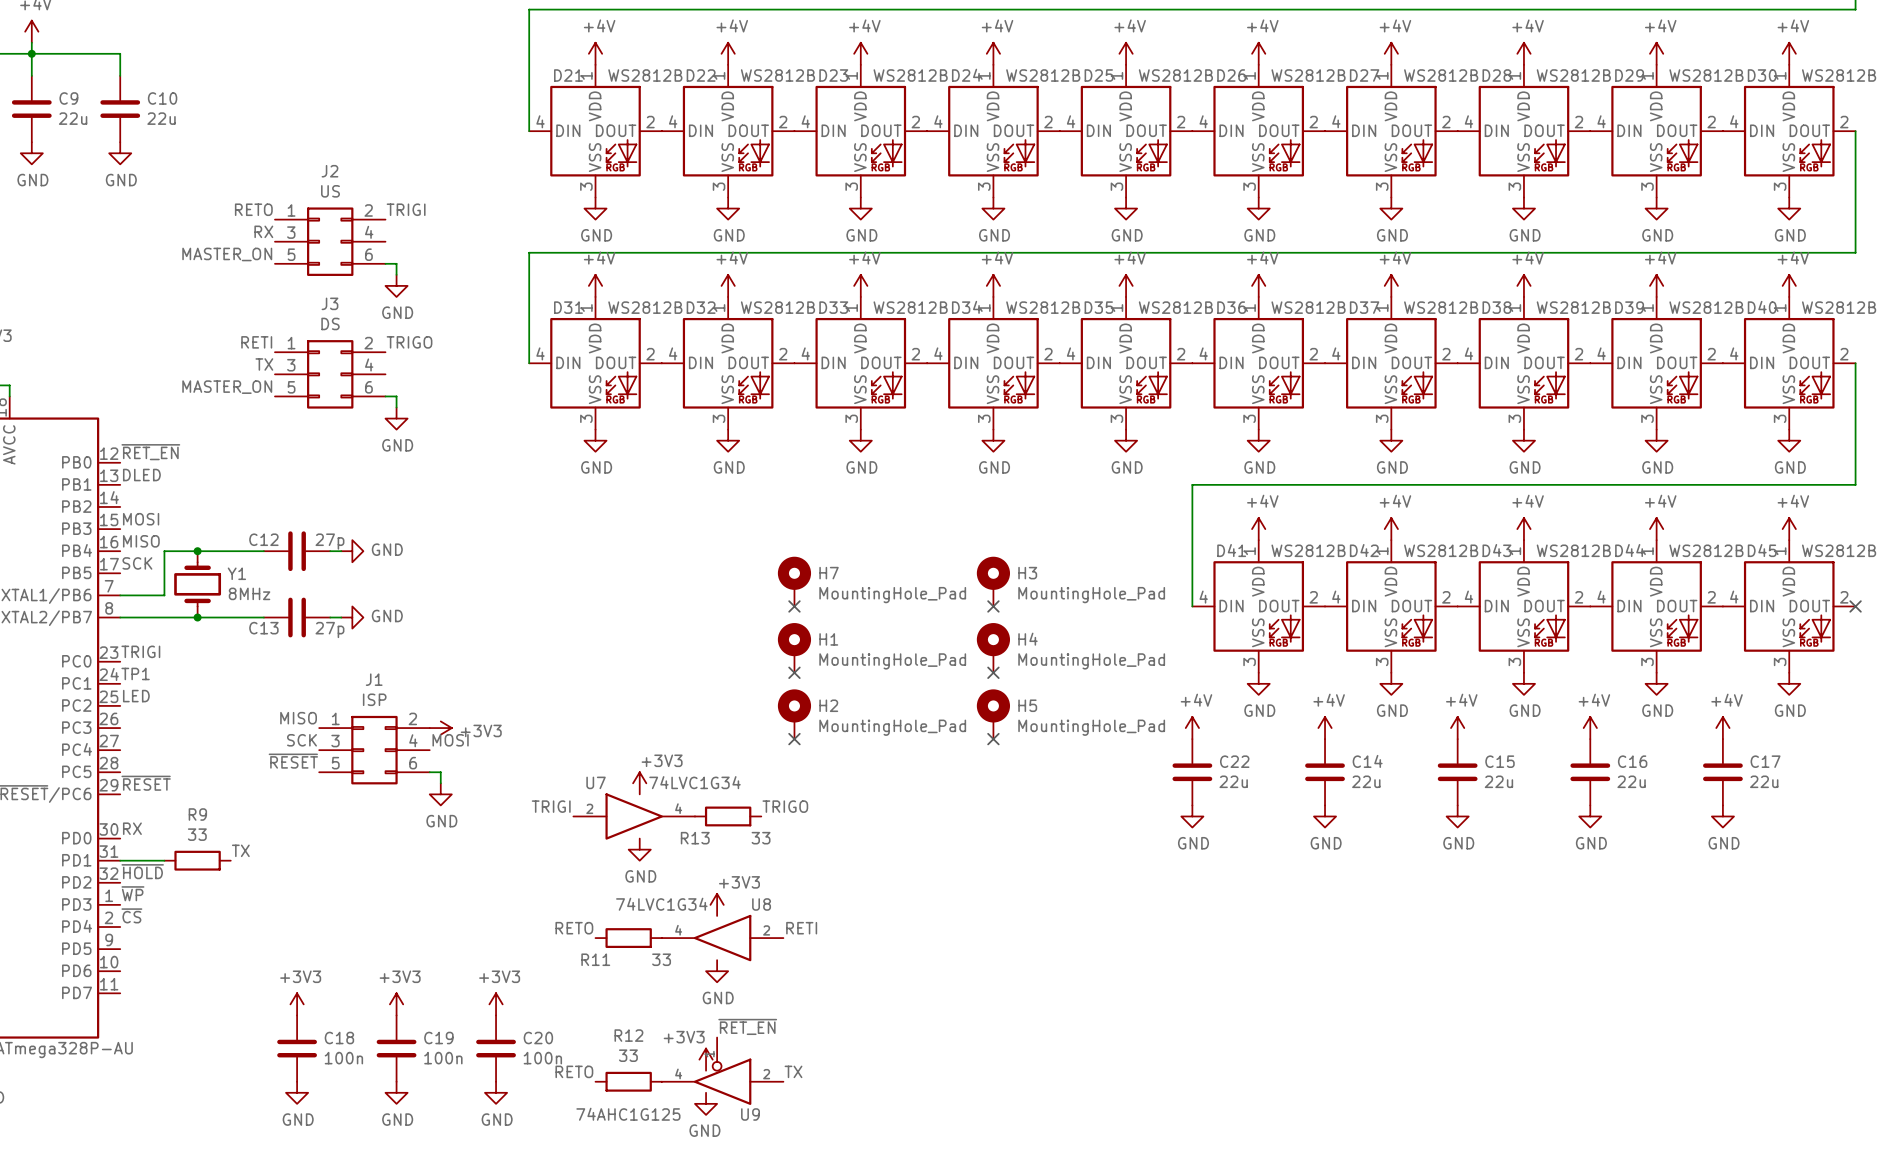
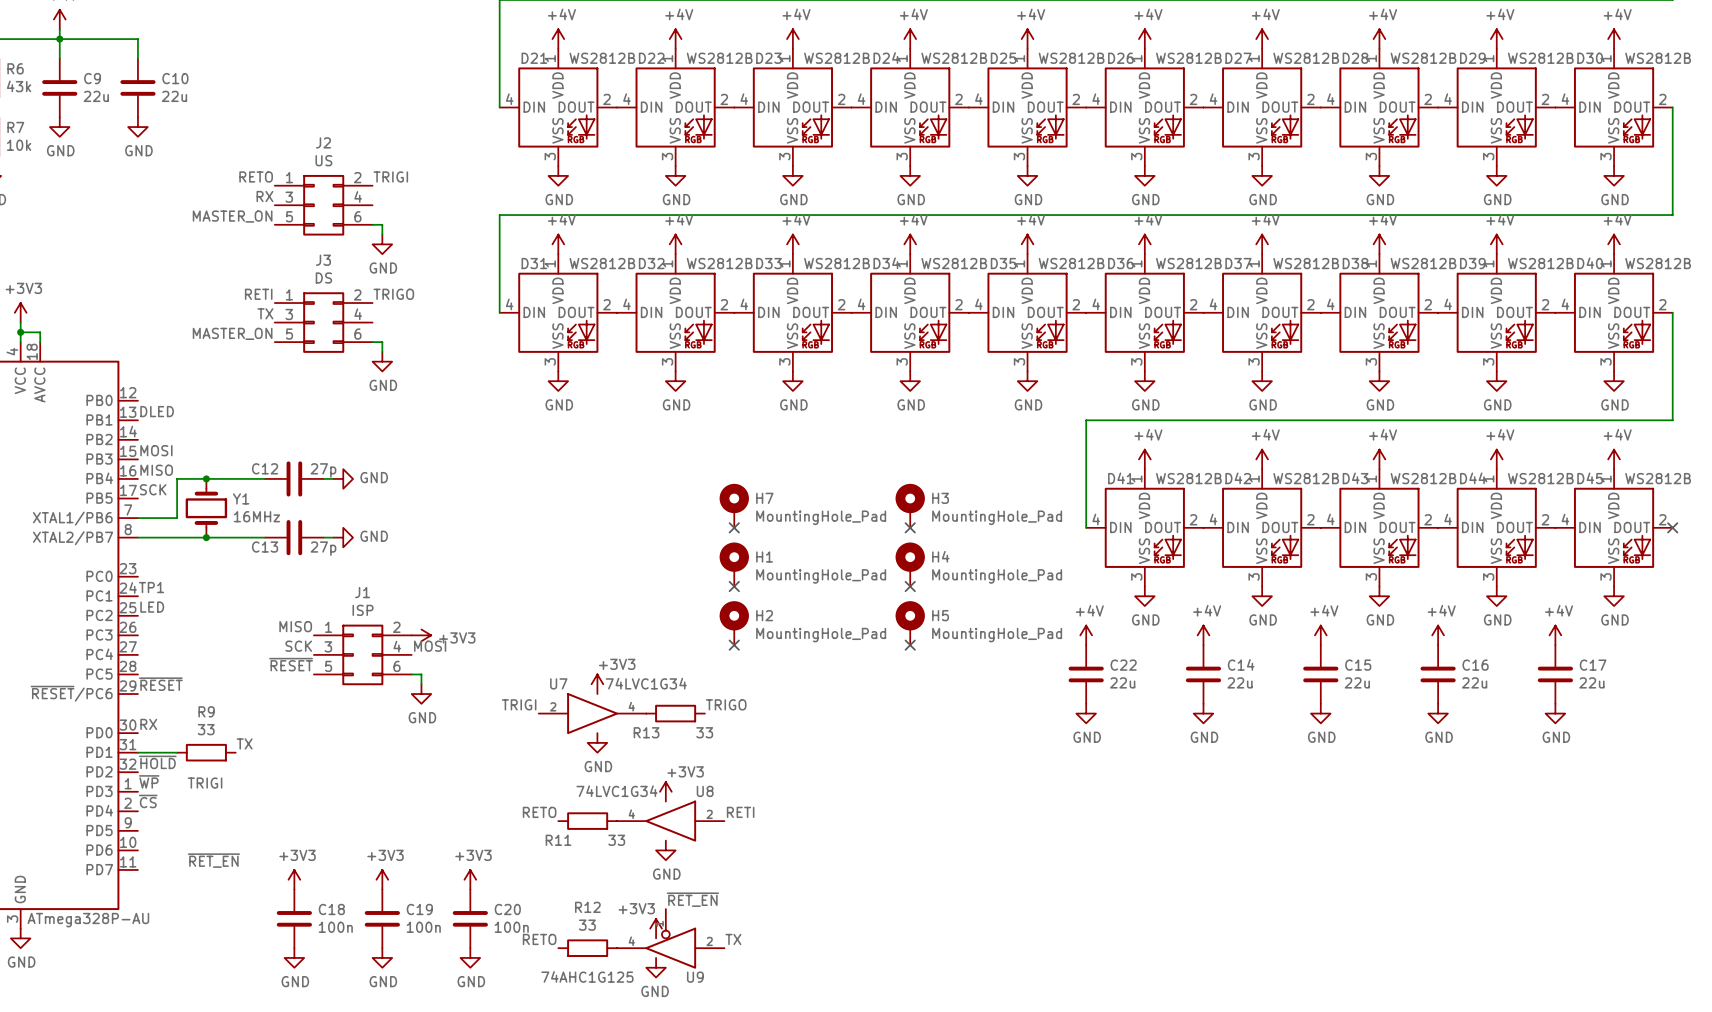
label: ~{RET_EN} (150, 452) -> none
Y1 value: 8MHz (249, 593) -> 16MHz (256, 516)
label: TRIGI (140, 651) -> none
label: none -> TRIGI (205, 783)
label: none -> ~{RET_EN} (213, 860)

